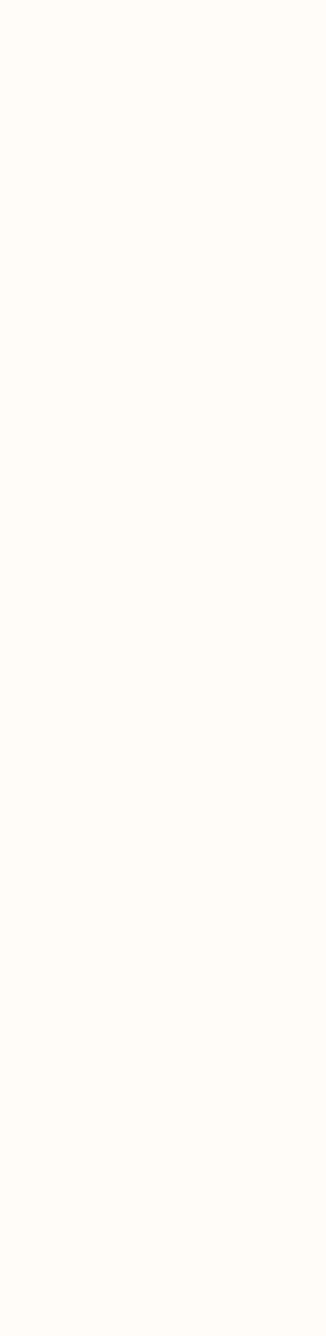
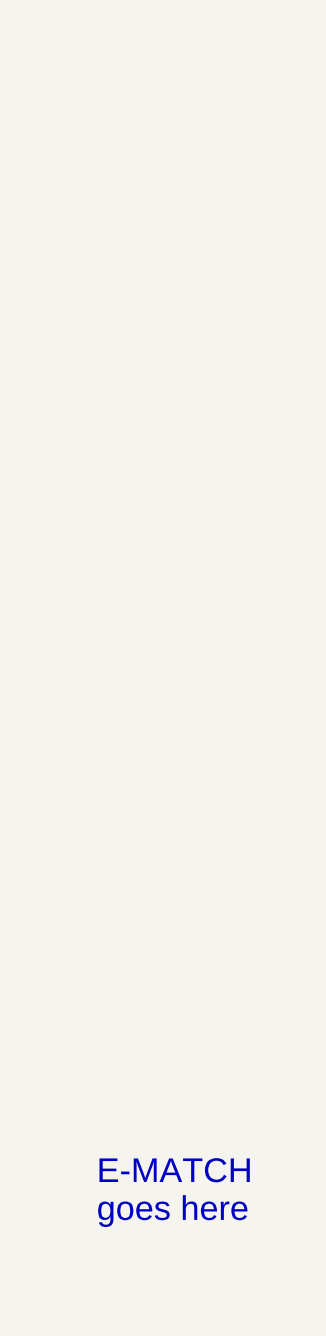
text: none -> E-MATCH (174, 1170)
text: none -> goes here (172, 1211)

